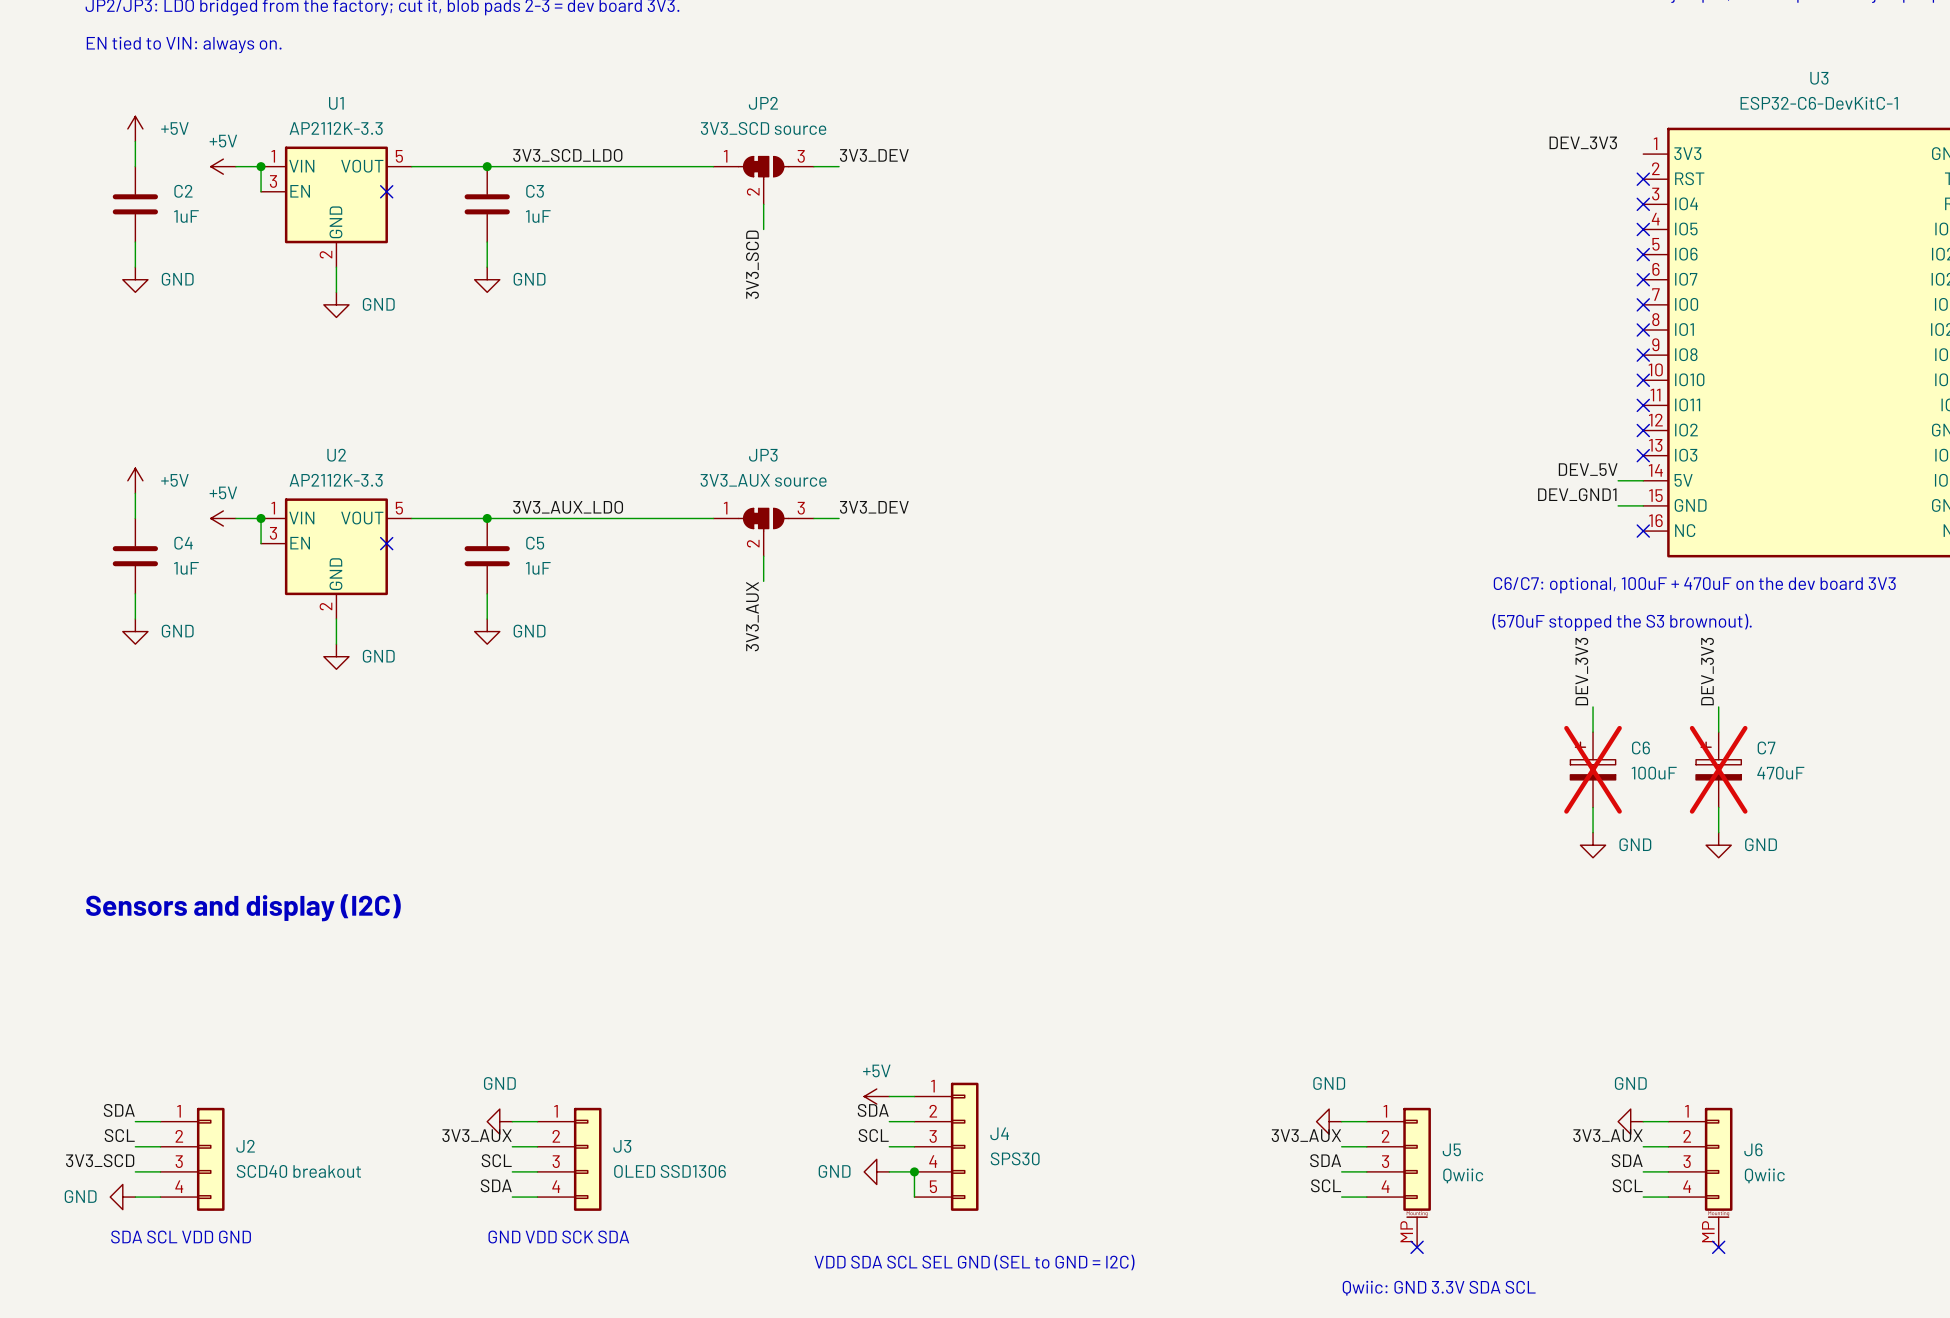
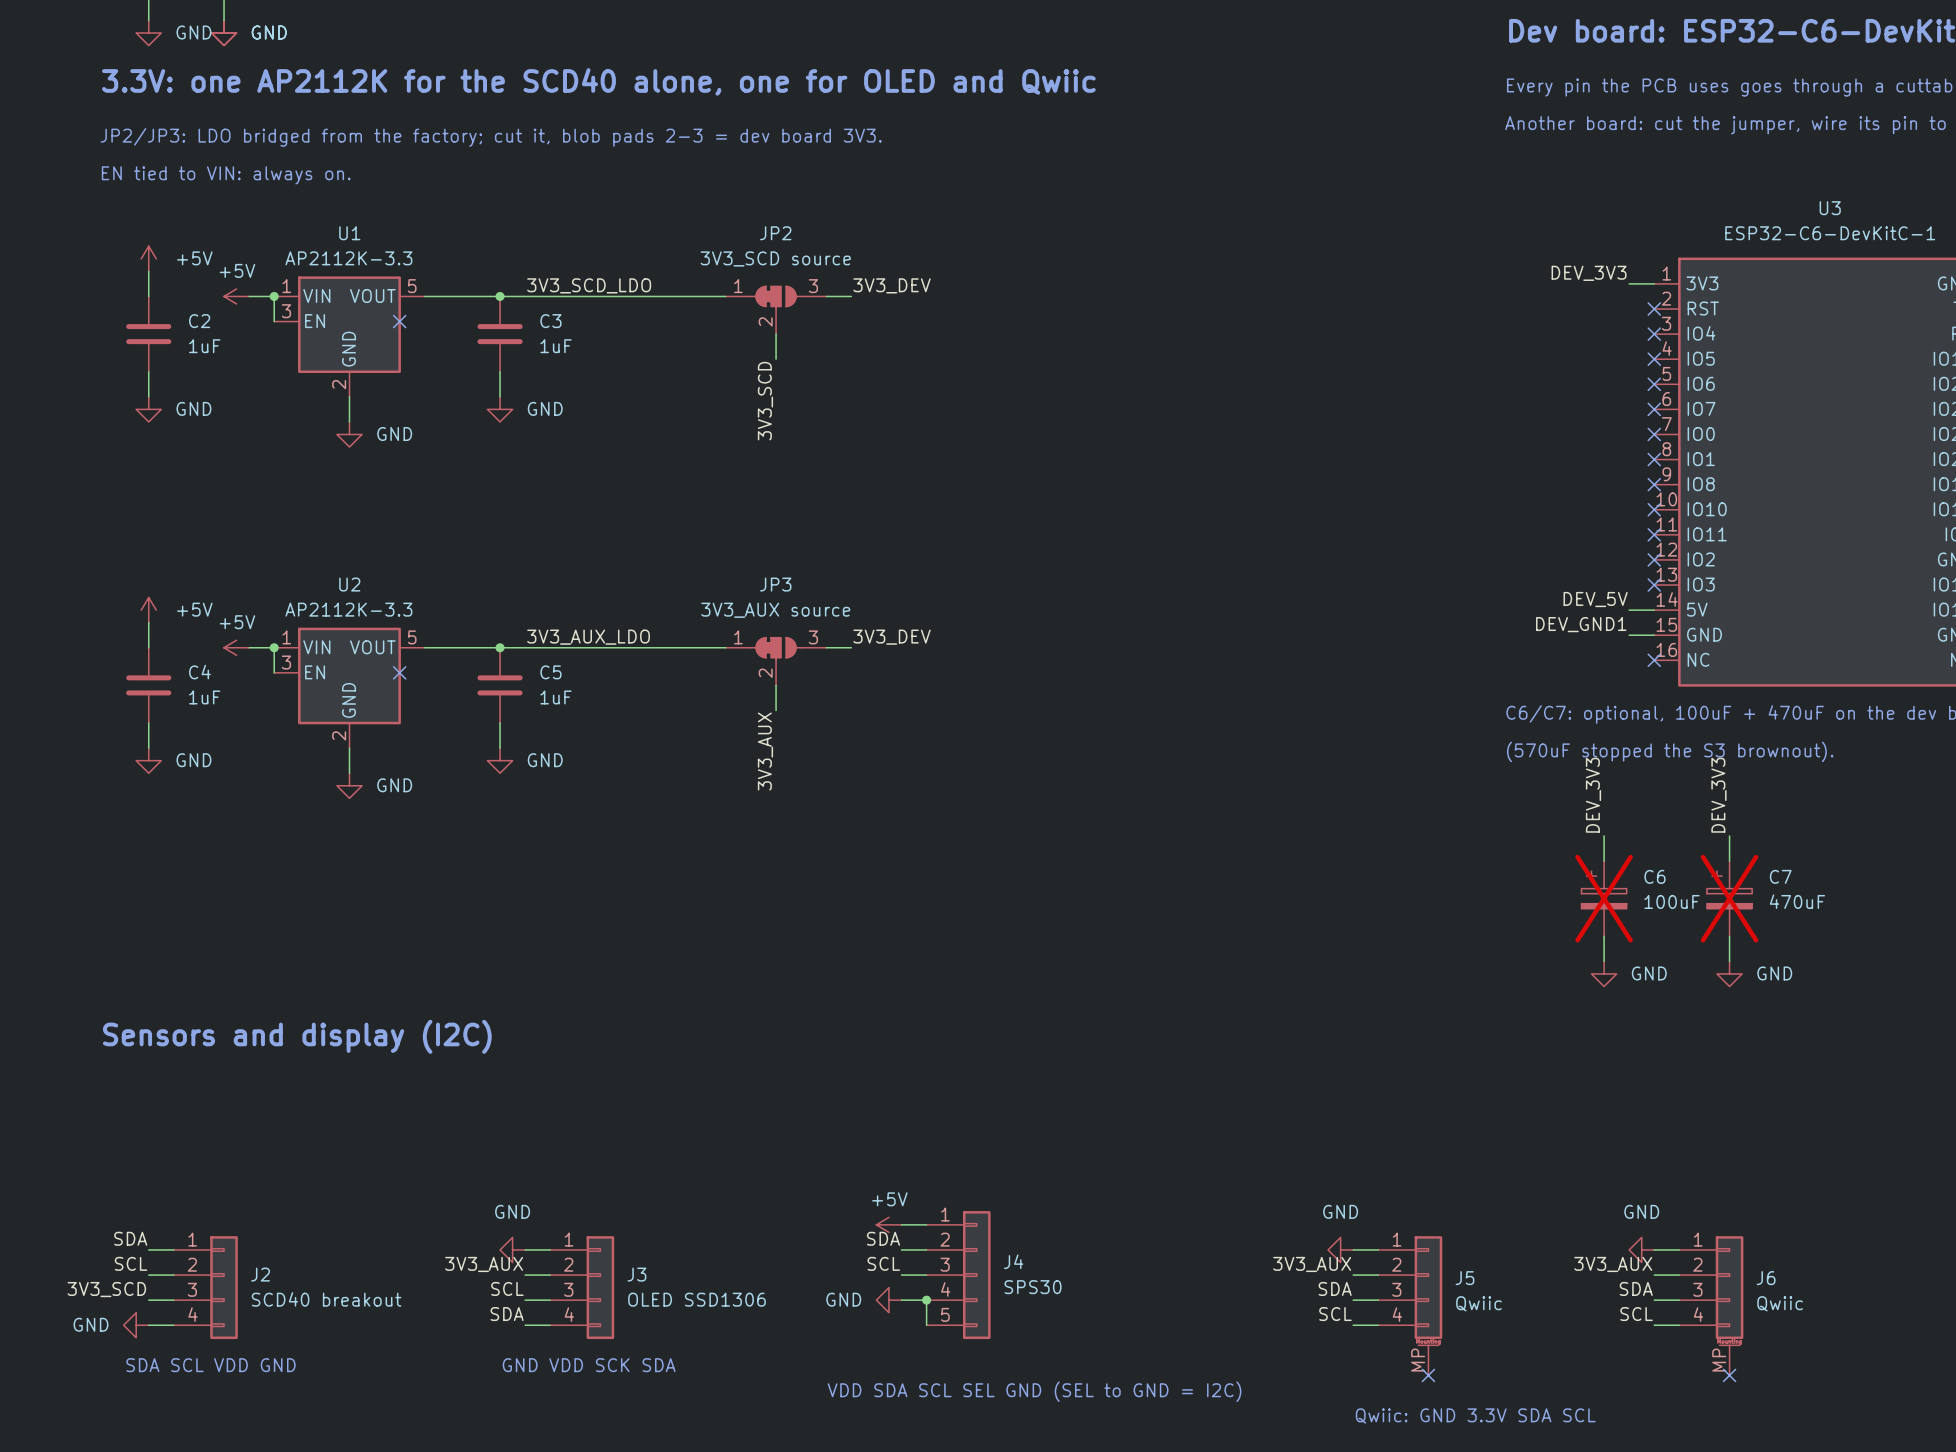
wire: none -> (1629, 283) (1654, 283)

